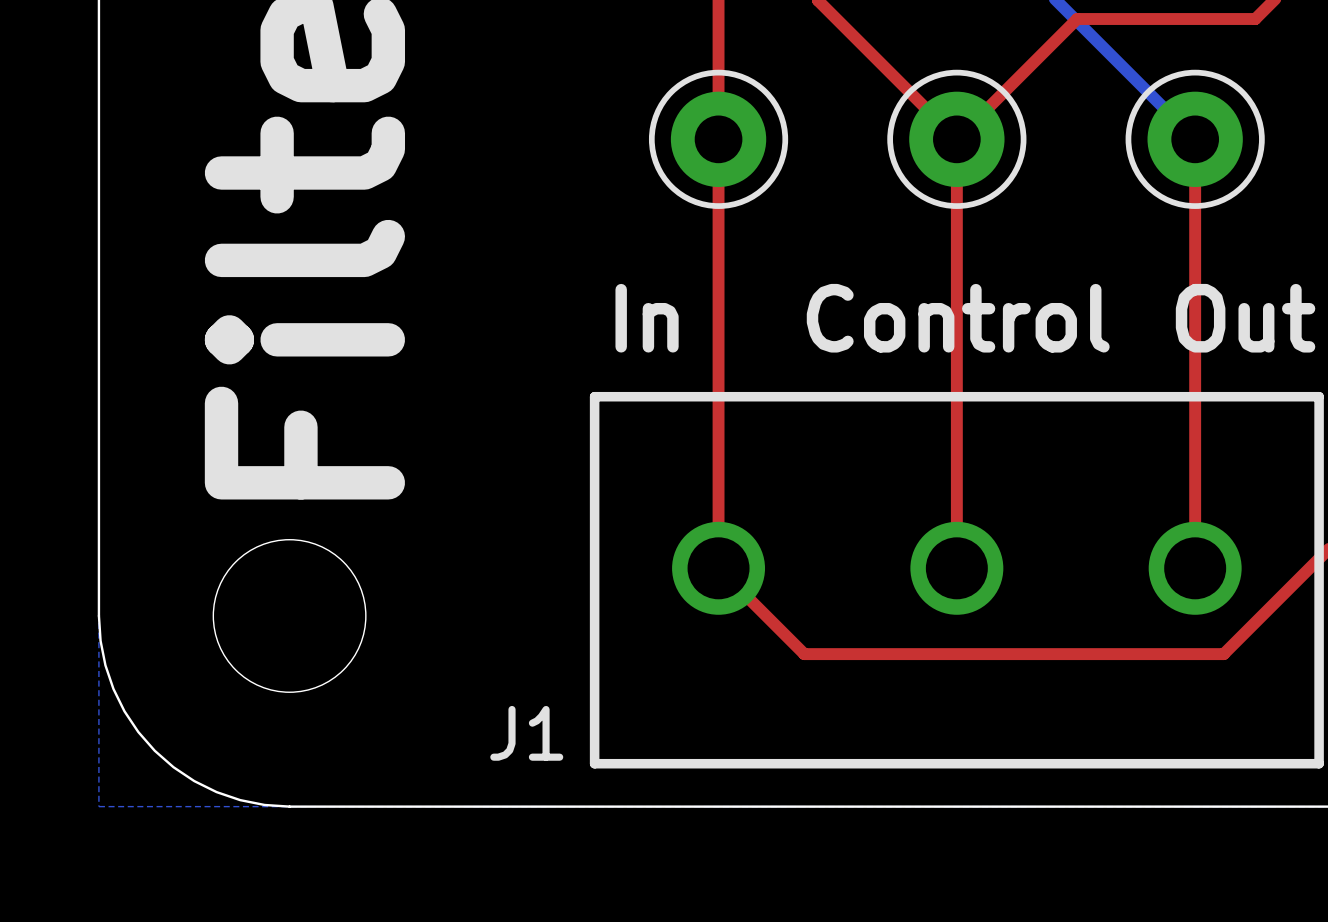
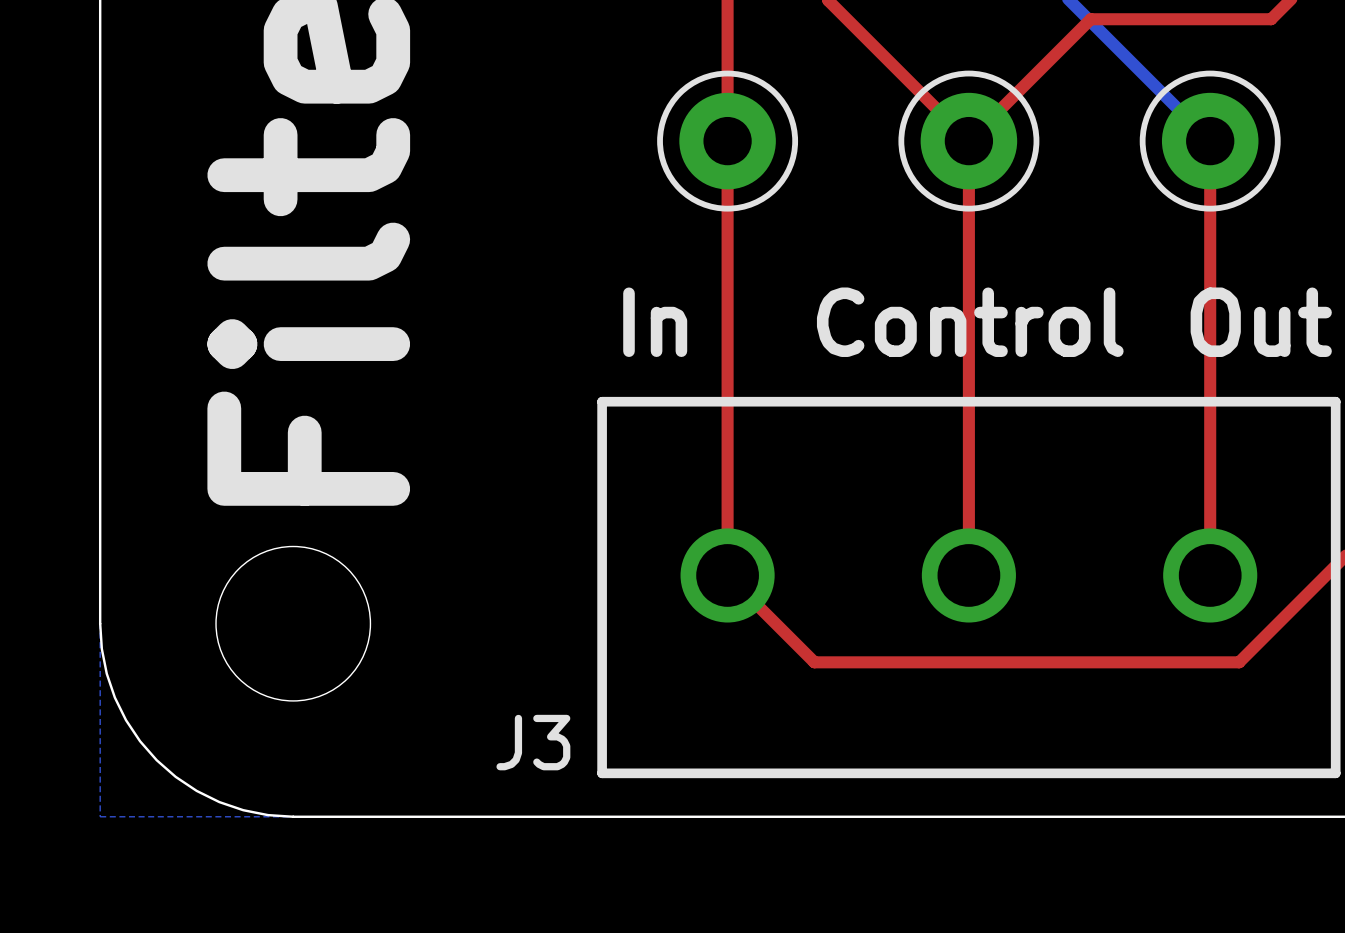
J1 name: J1 (526, 733) -> J3 (533, 742)

